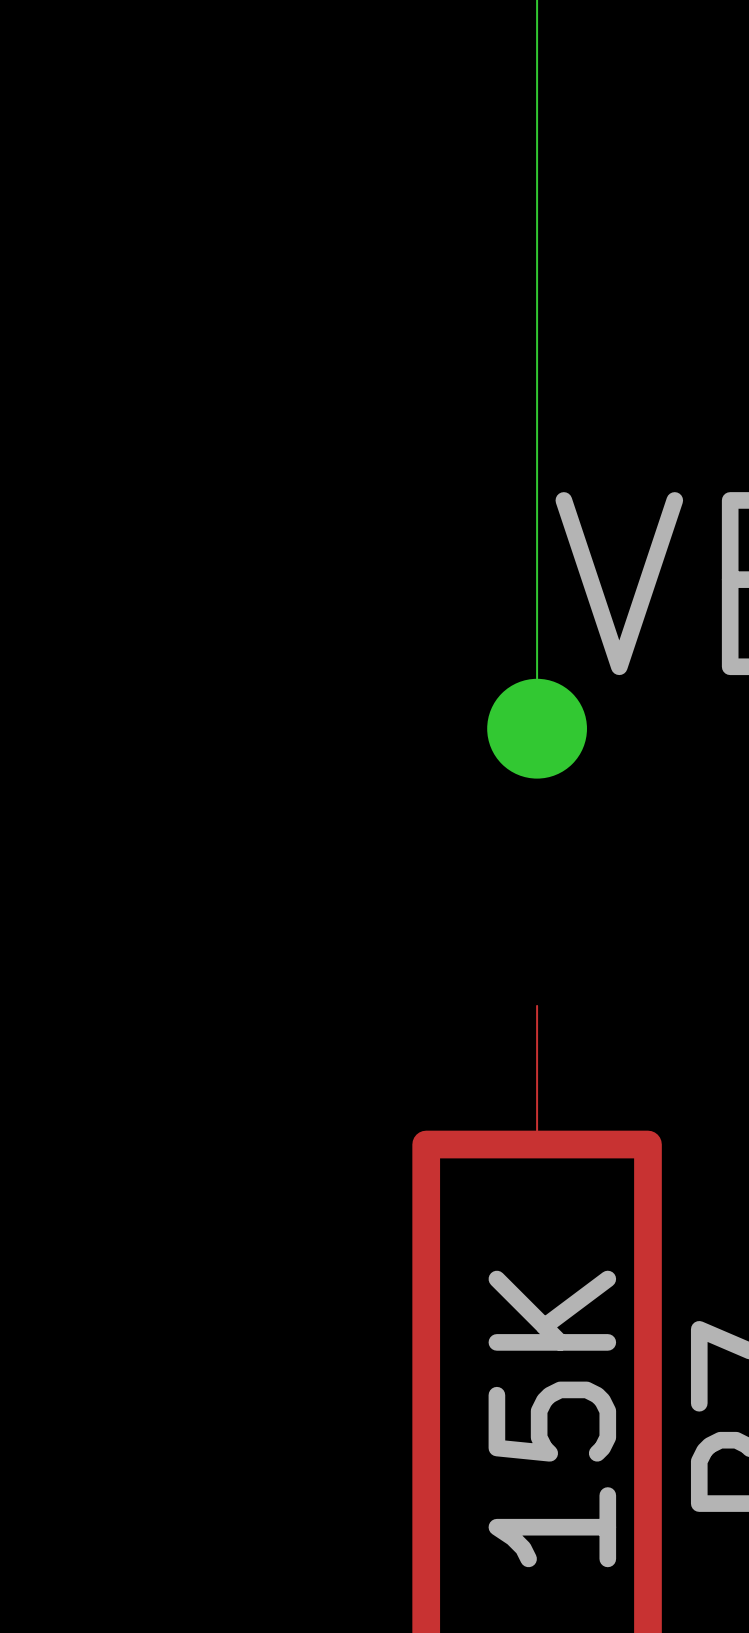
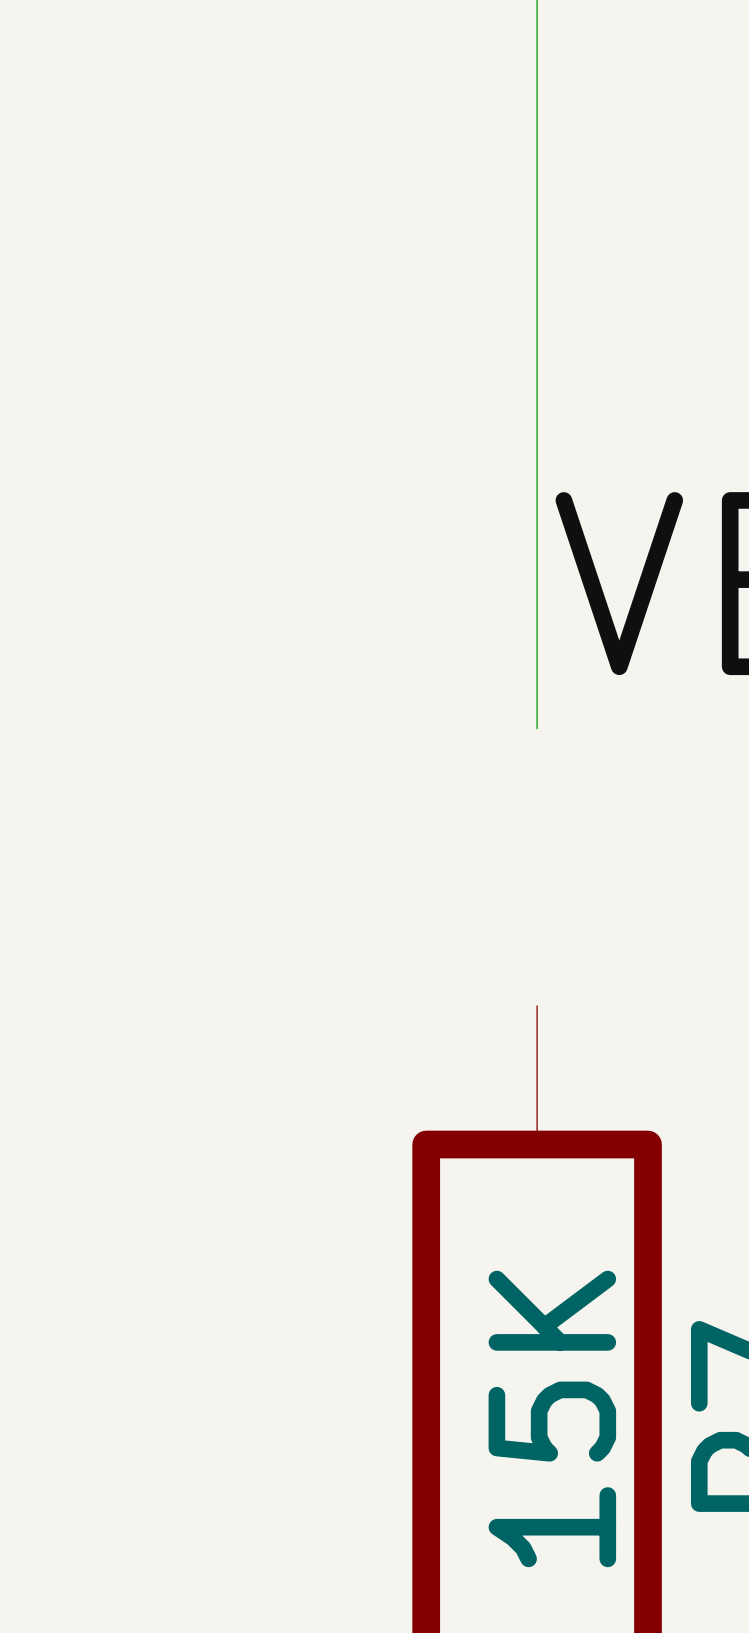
junction: (537, 728) -> none

